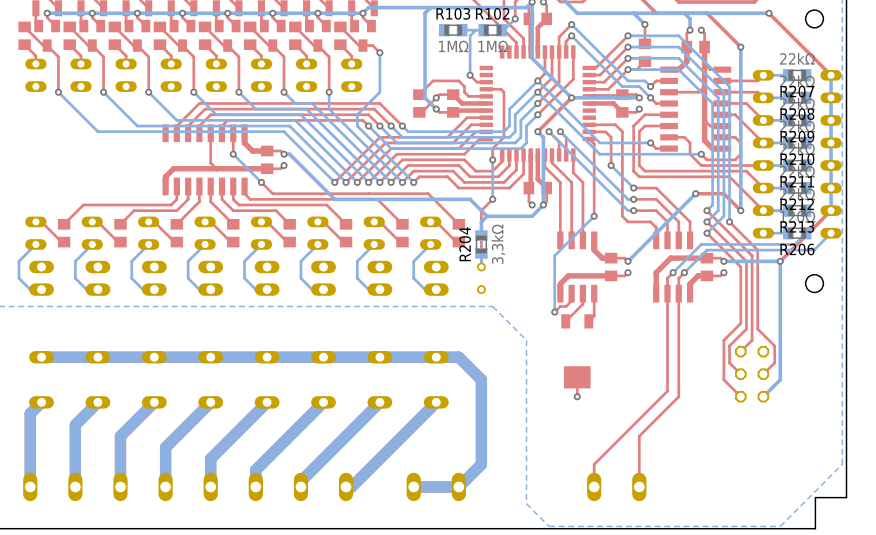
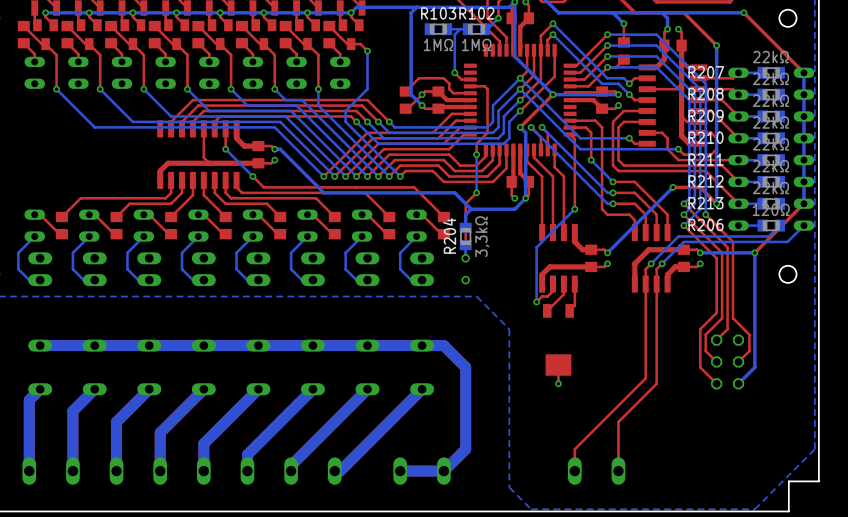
R207 name position: R207 (797, 91) -> R207 (706, 72)
R208 name position: R208 (797, 114) -> R208 (705, 94)
R209 name position: R209 (797, 136) -> R209 (705, 115)
R210 name position: R210 (797, 159) -> R210 (705, 137)
R211 name position: R211 (797, 181) -> R211 (705, 159)
R212 name position: R212 (797, 204) -> R212 (705, 181)
R213 name position: R213 (797, 226) -> R213 (705, 203)
R206 name position: R206 (797, 249) -> R206 (705, 224)

